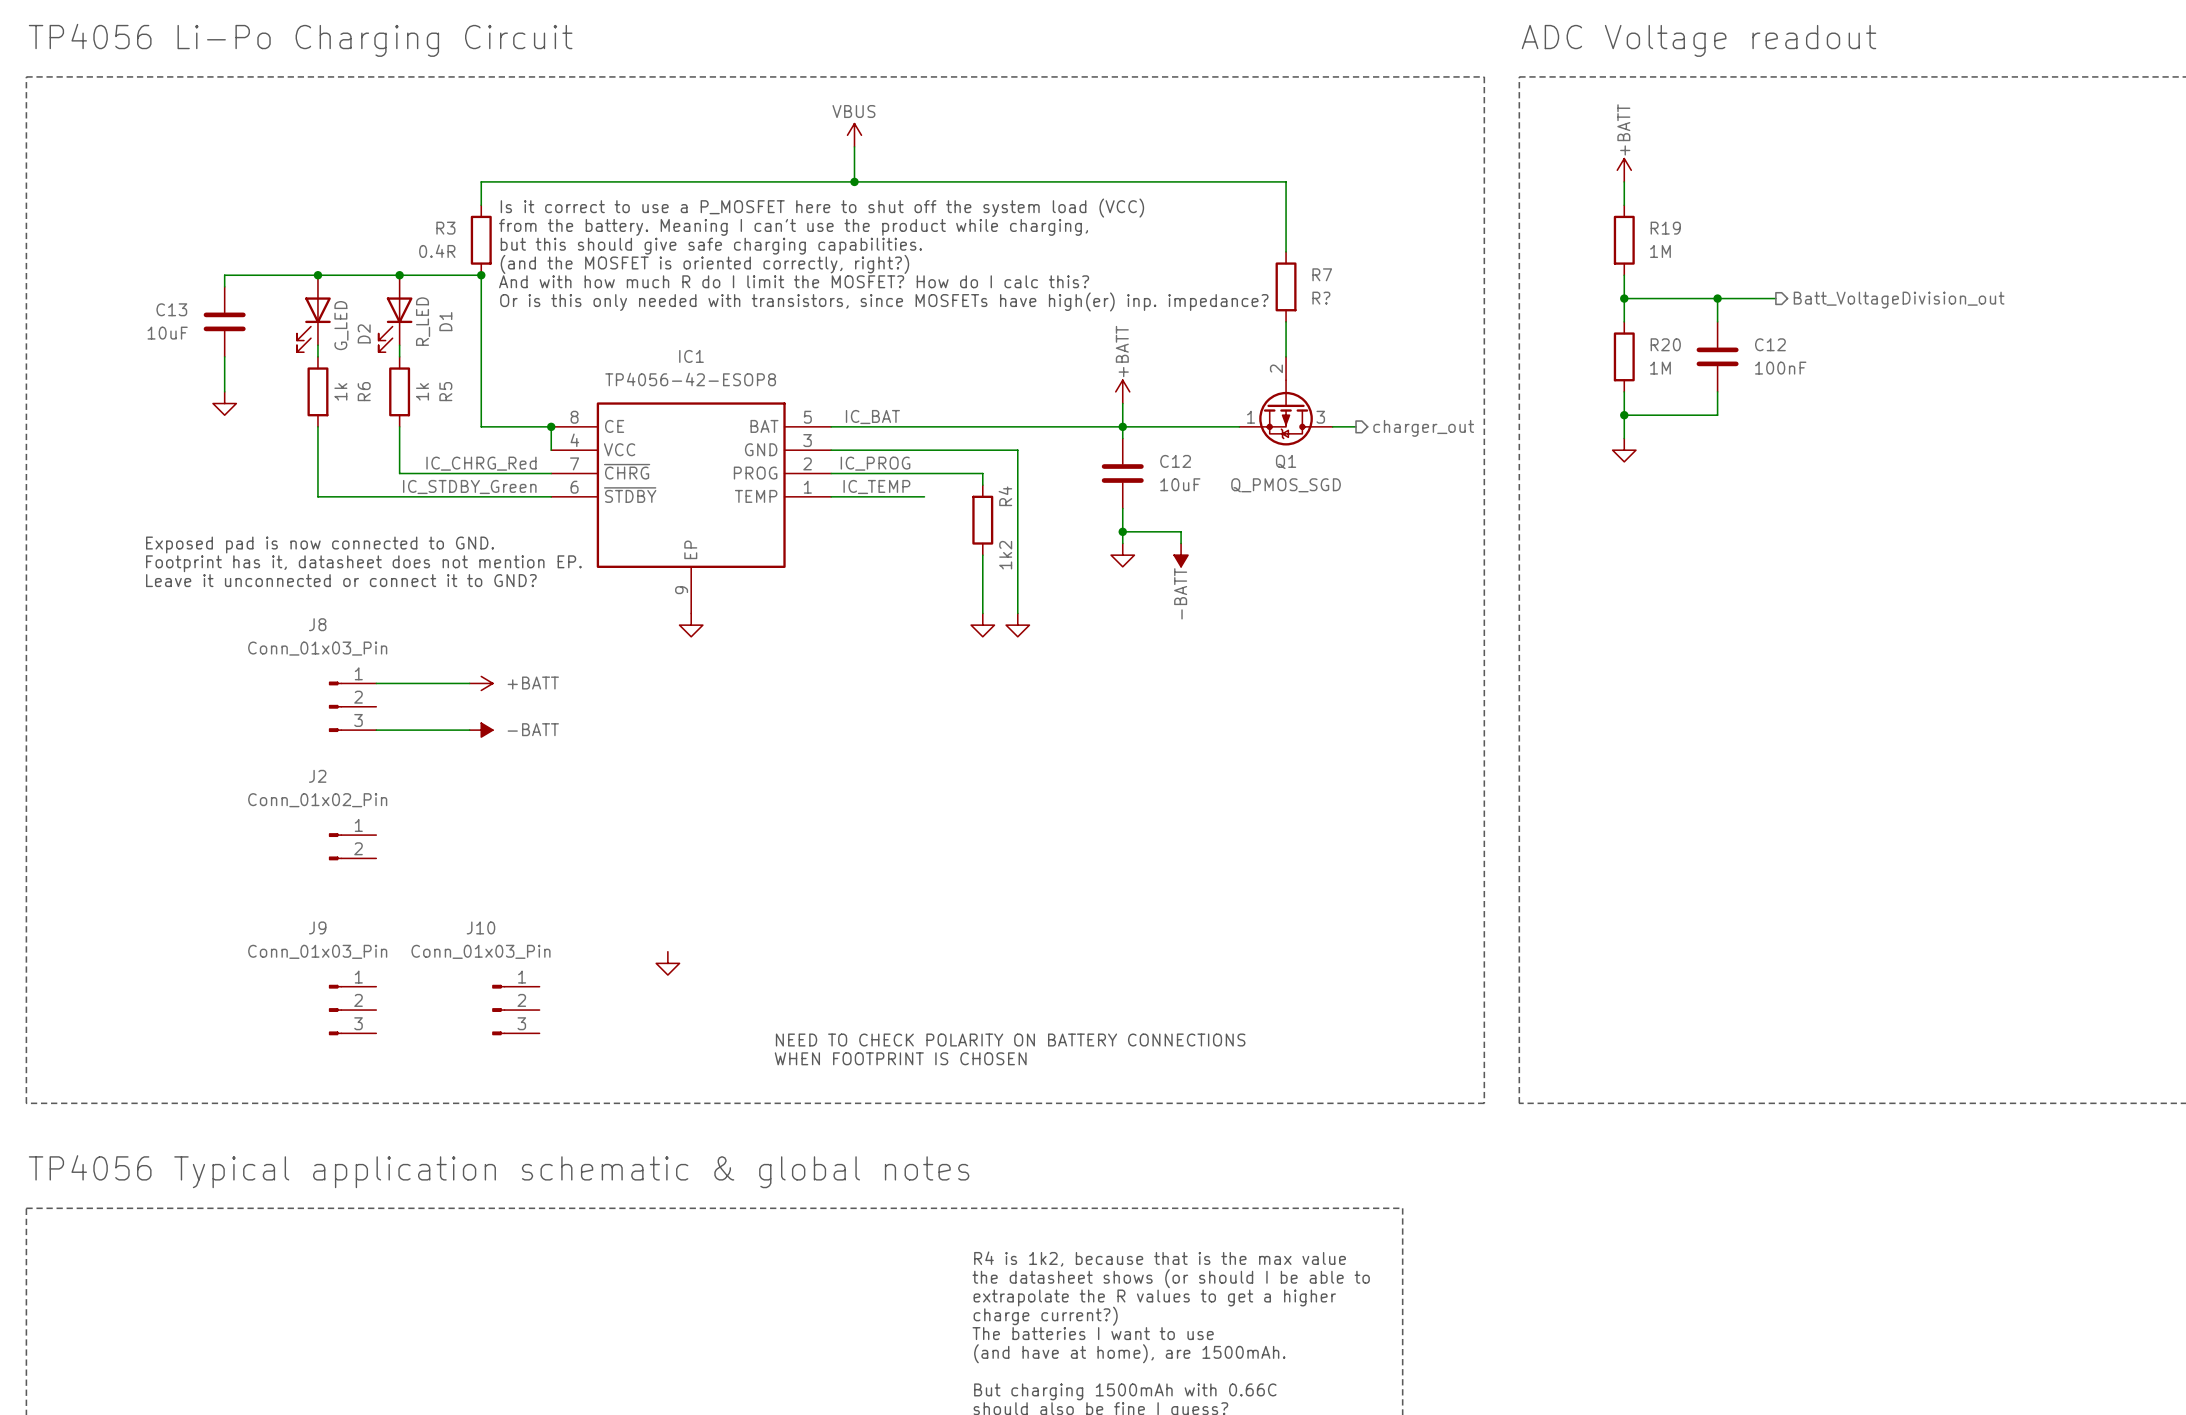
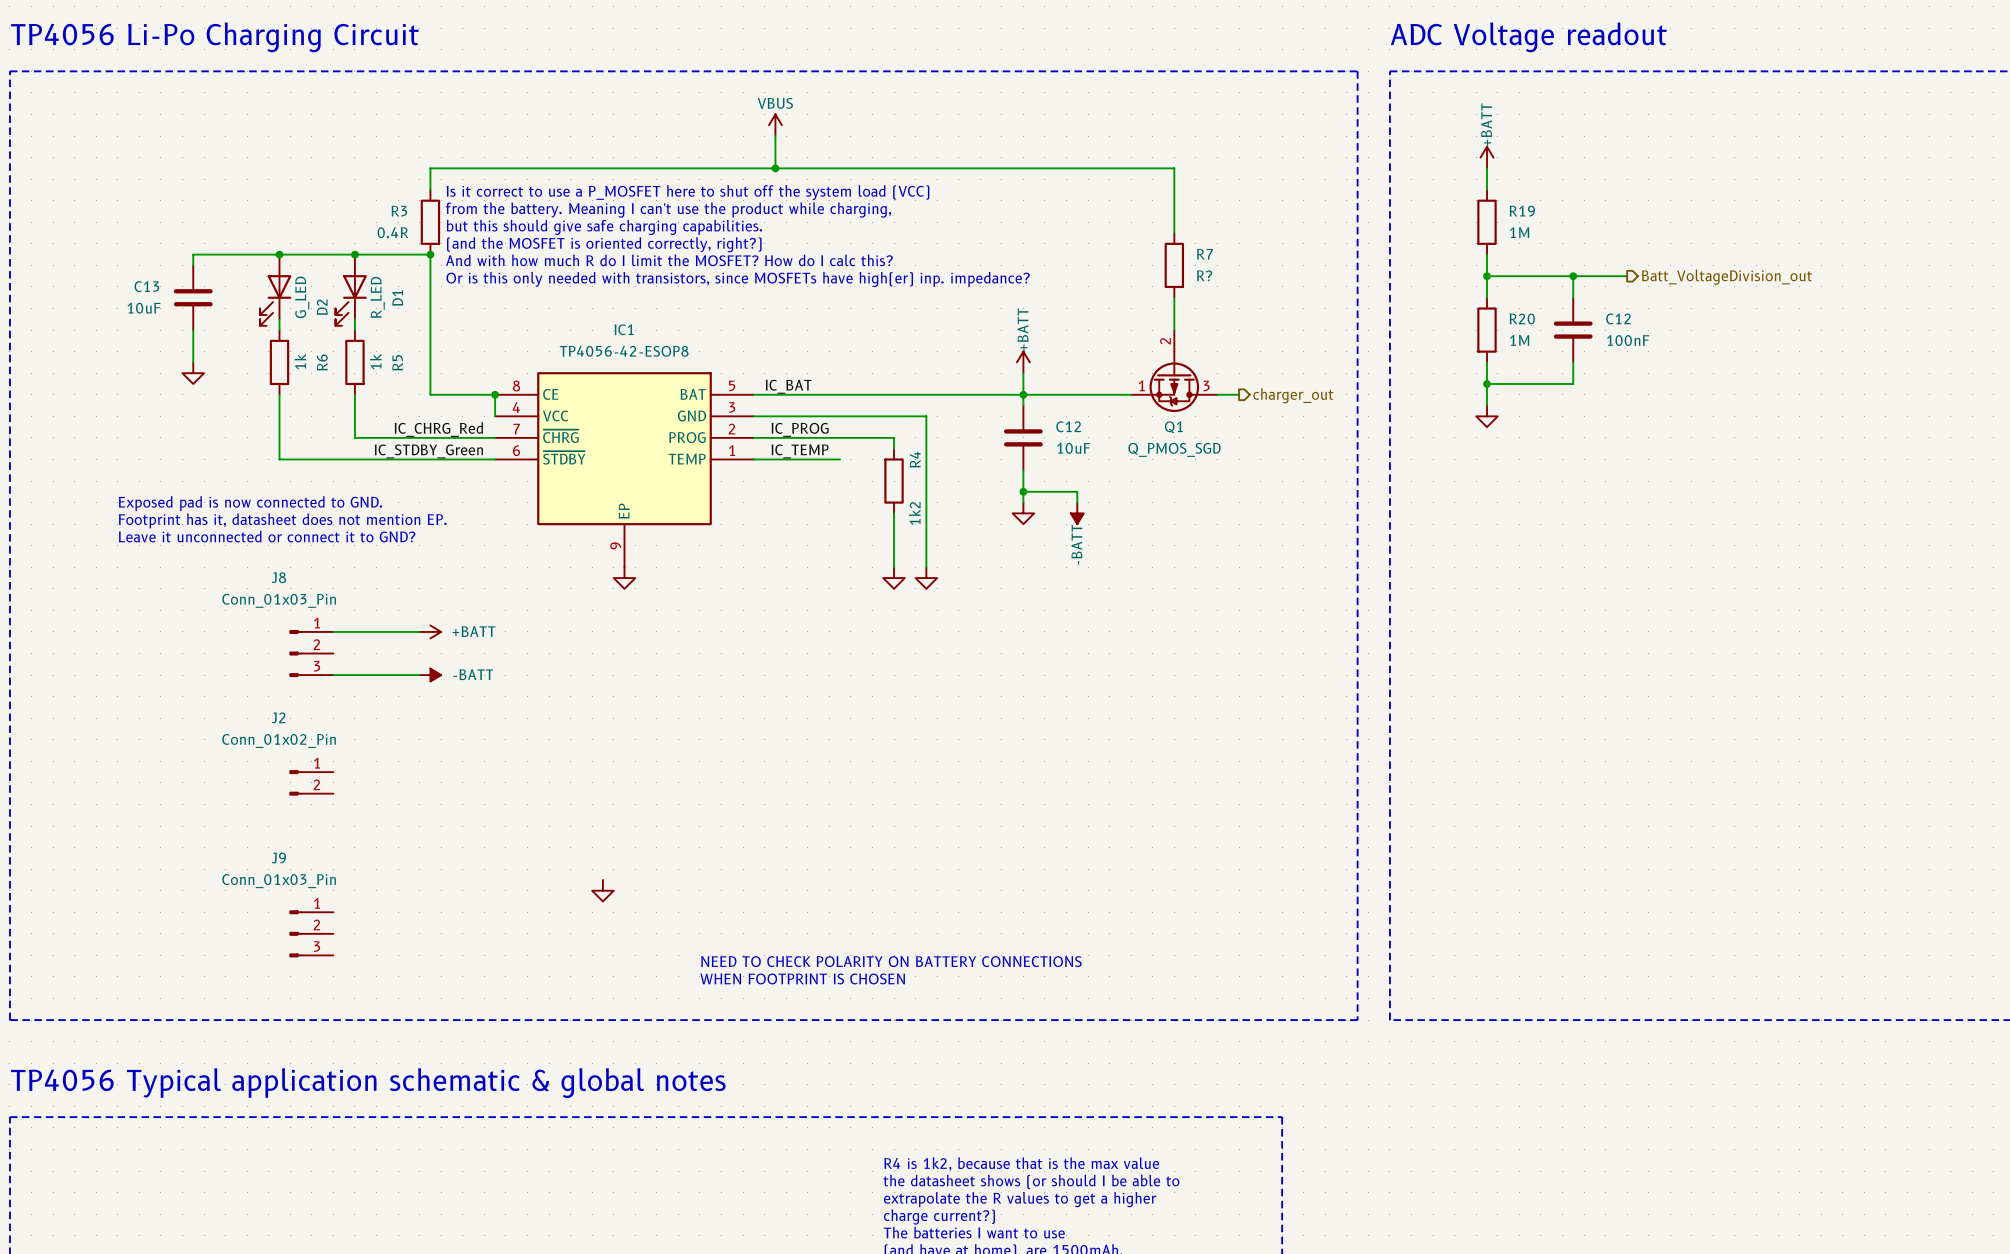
J10: Conn_01x03_Pin (515, 1010) -> none

